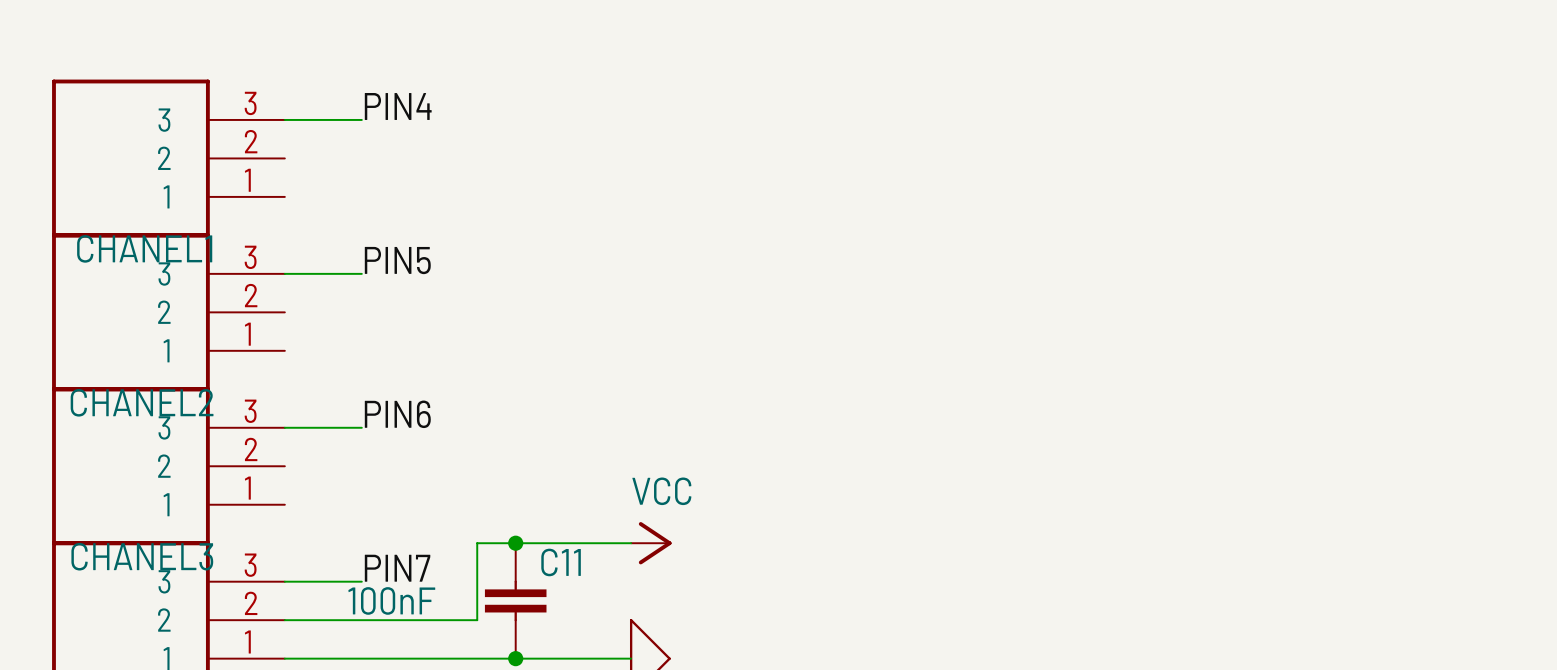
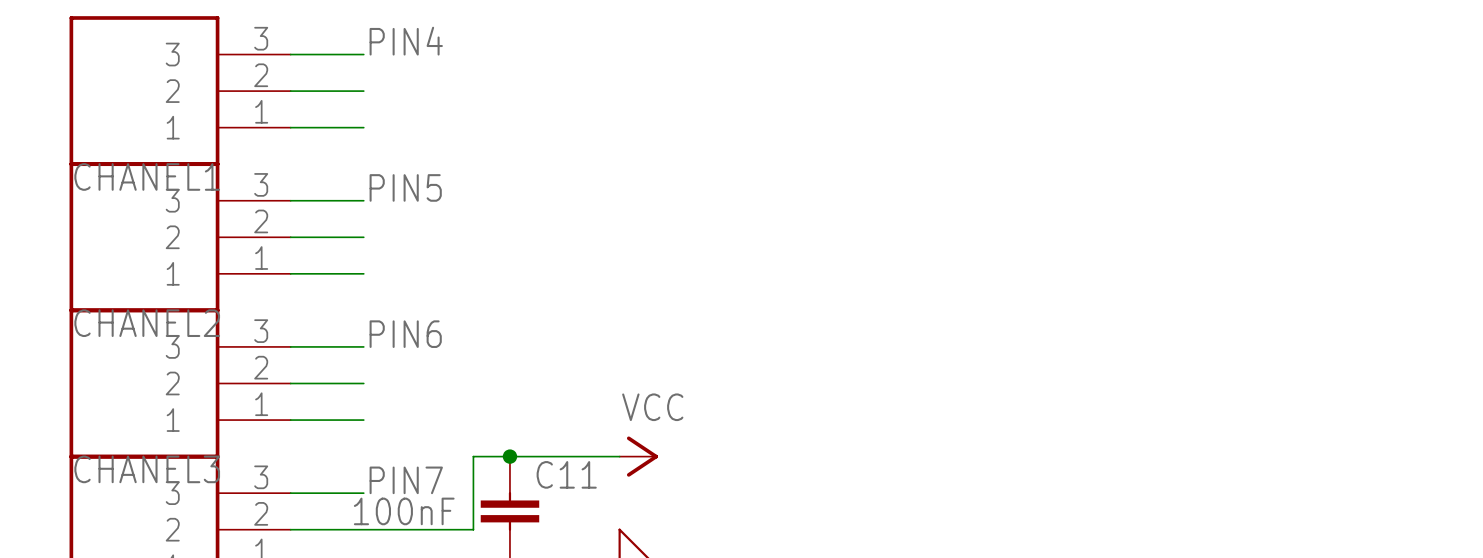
wire: none -> (290, 91) (363, 91)
wire: none -> (290, 127) (363, 127)
wire: none -> (290, 237) (363, 237)
wire: none -> (290, 273) (363, 273)
wire: none -> (290, 383) (363, 383)
wire: none -> (290, 420) (363, 420)

